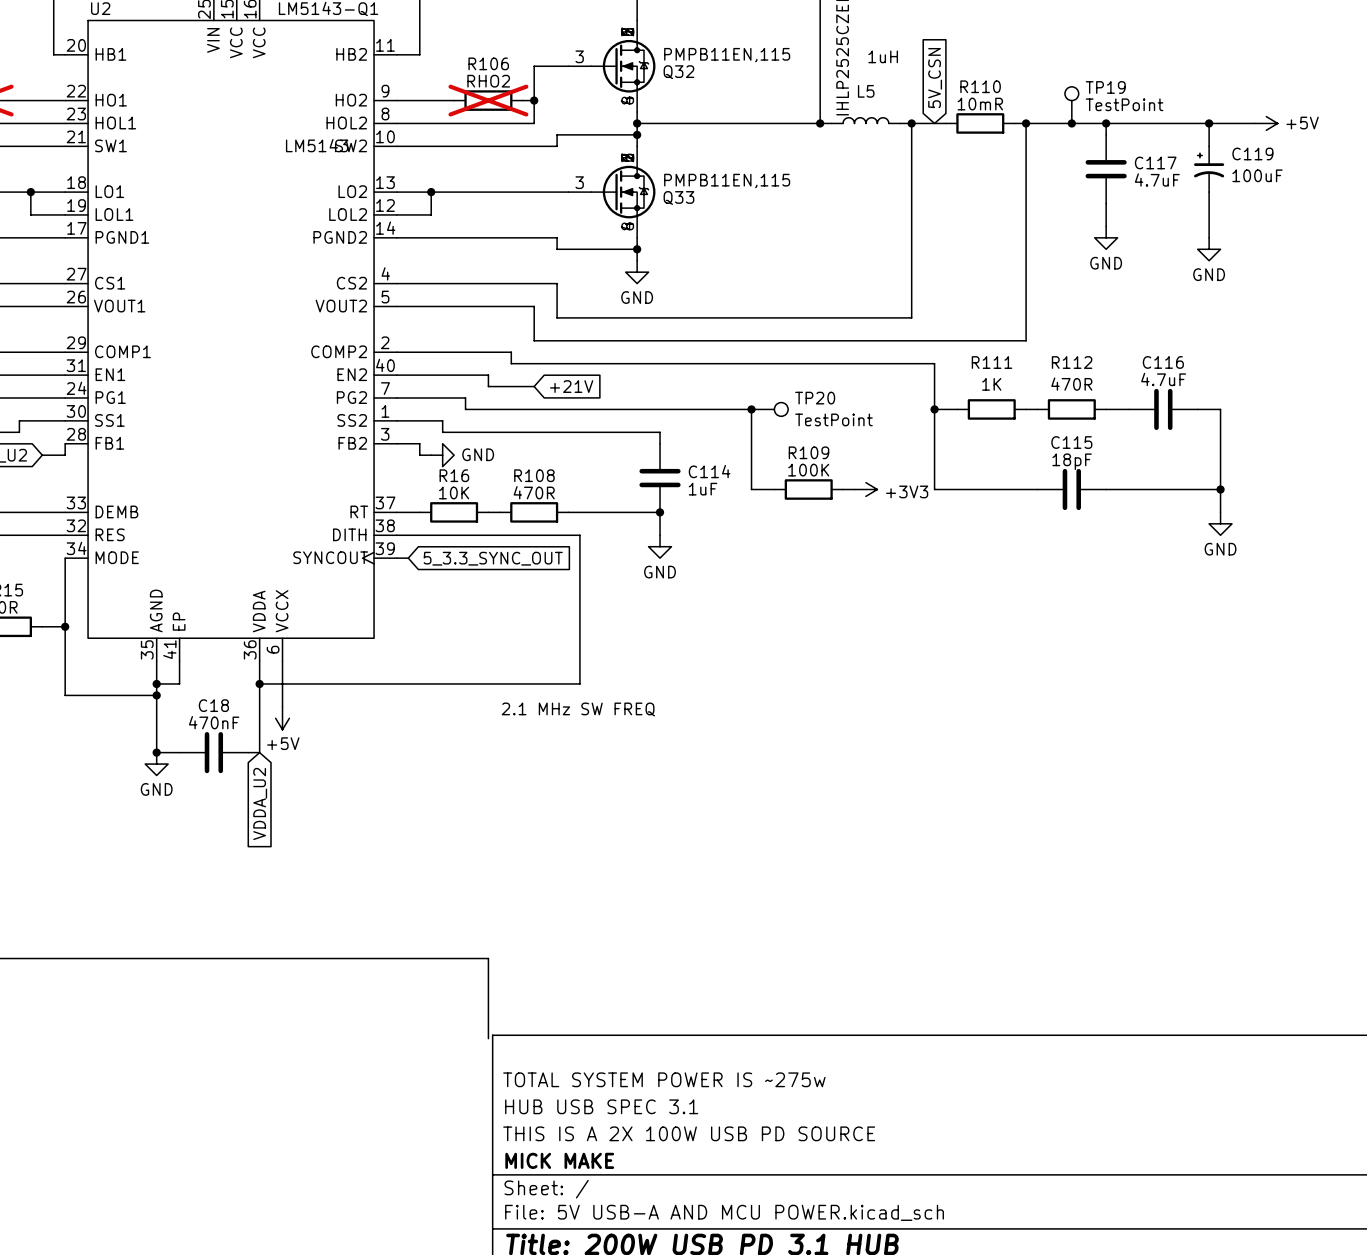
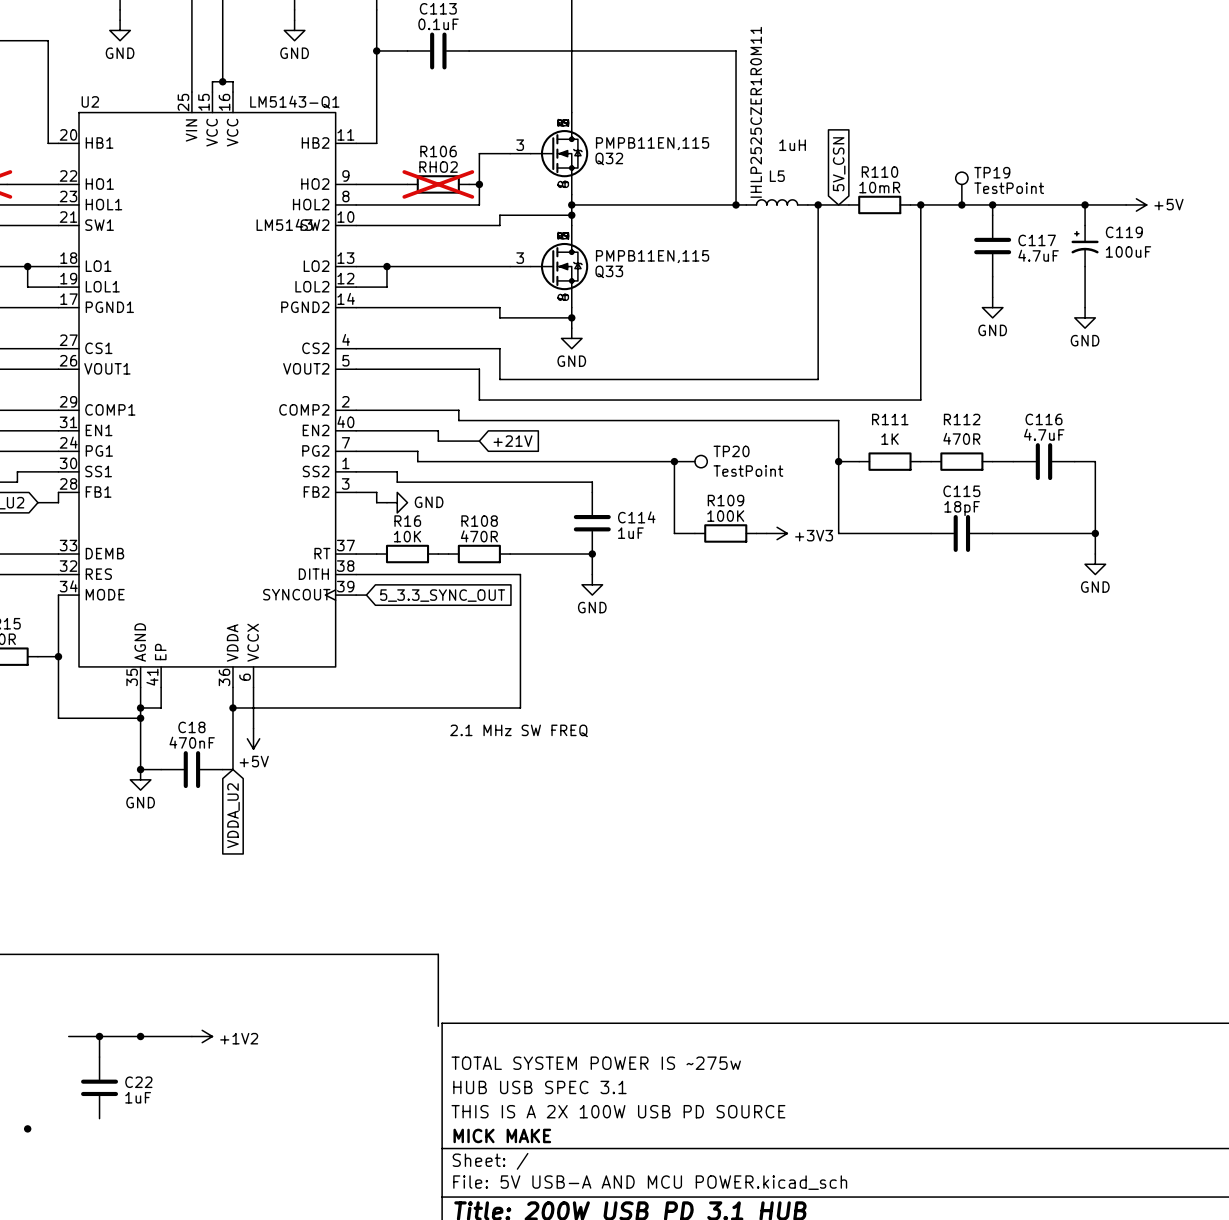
wire: none -> (68, 1036) (191, 1036)
wire: none -> (99, 1036) (99, 1057)
junction: none -> (99, 1036)
junction: none -> (140, 1036)
power symbol: none -> +1V2 (202, 1036)
C22: none -> 1uF (99, 1087)
junction: none -> (27, 1128)

